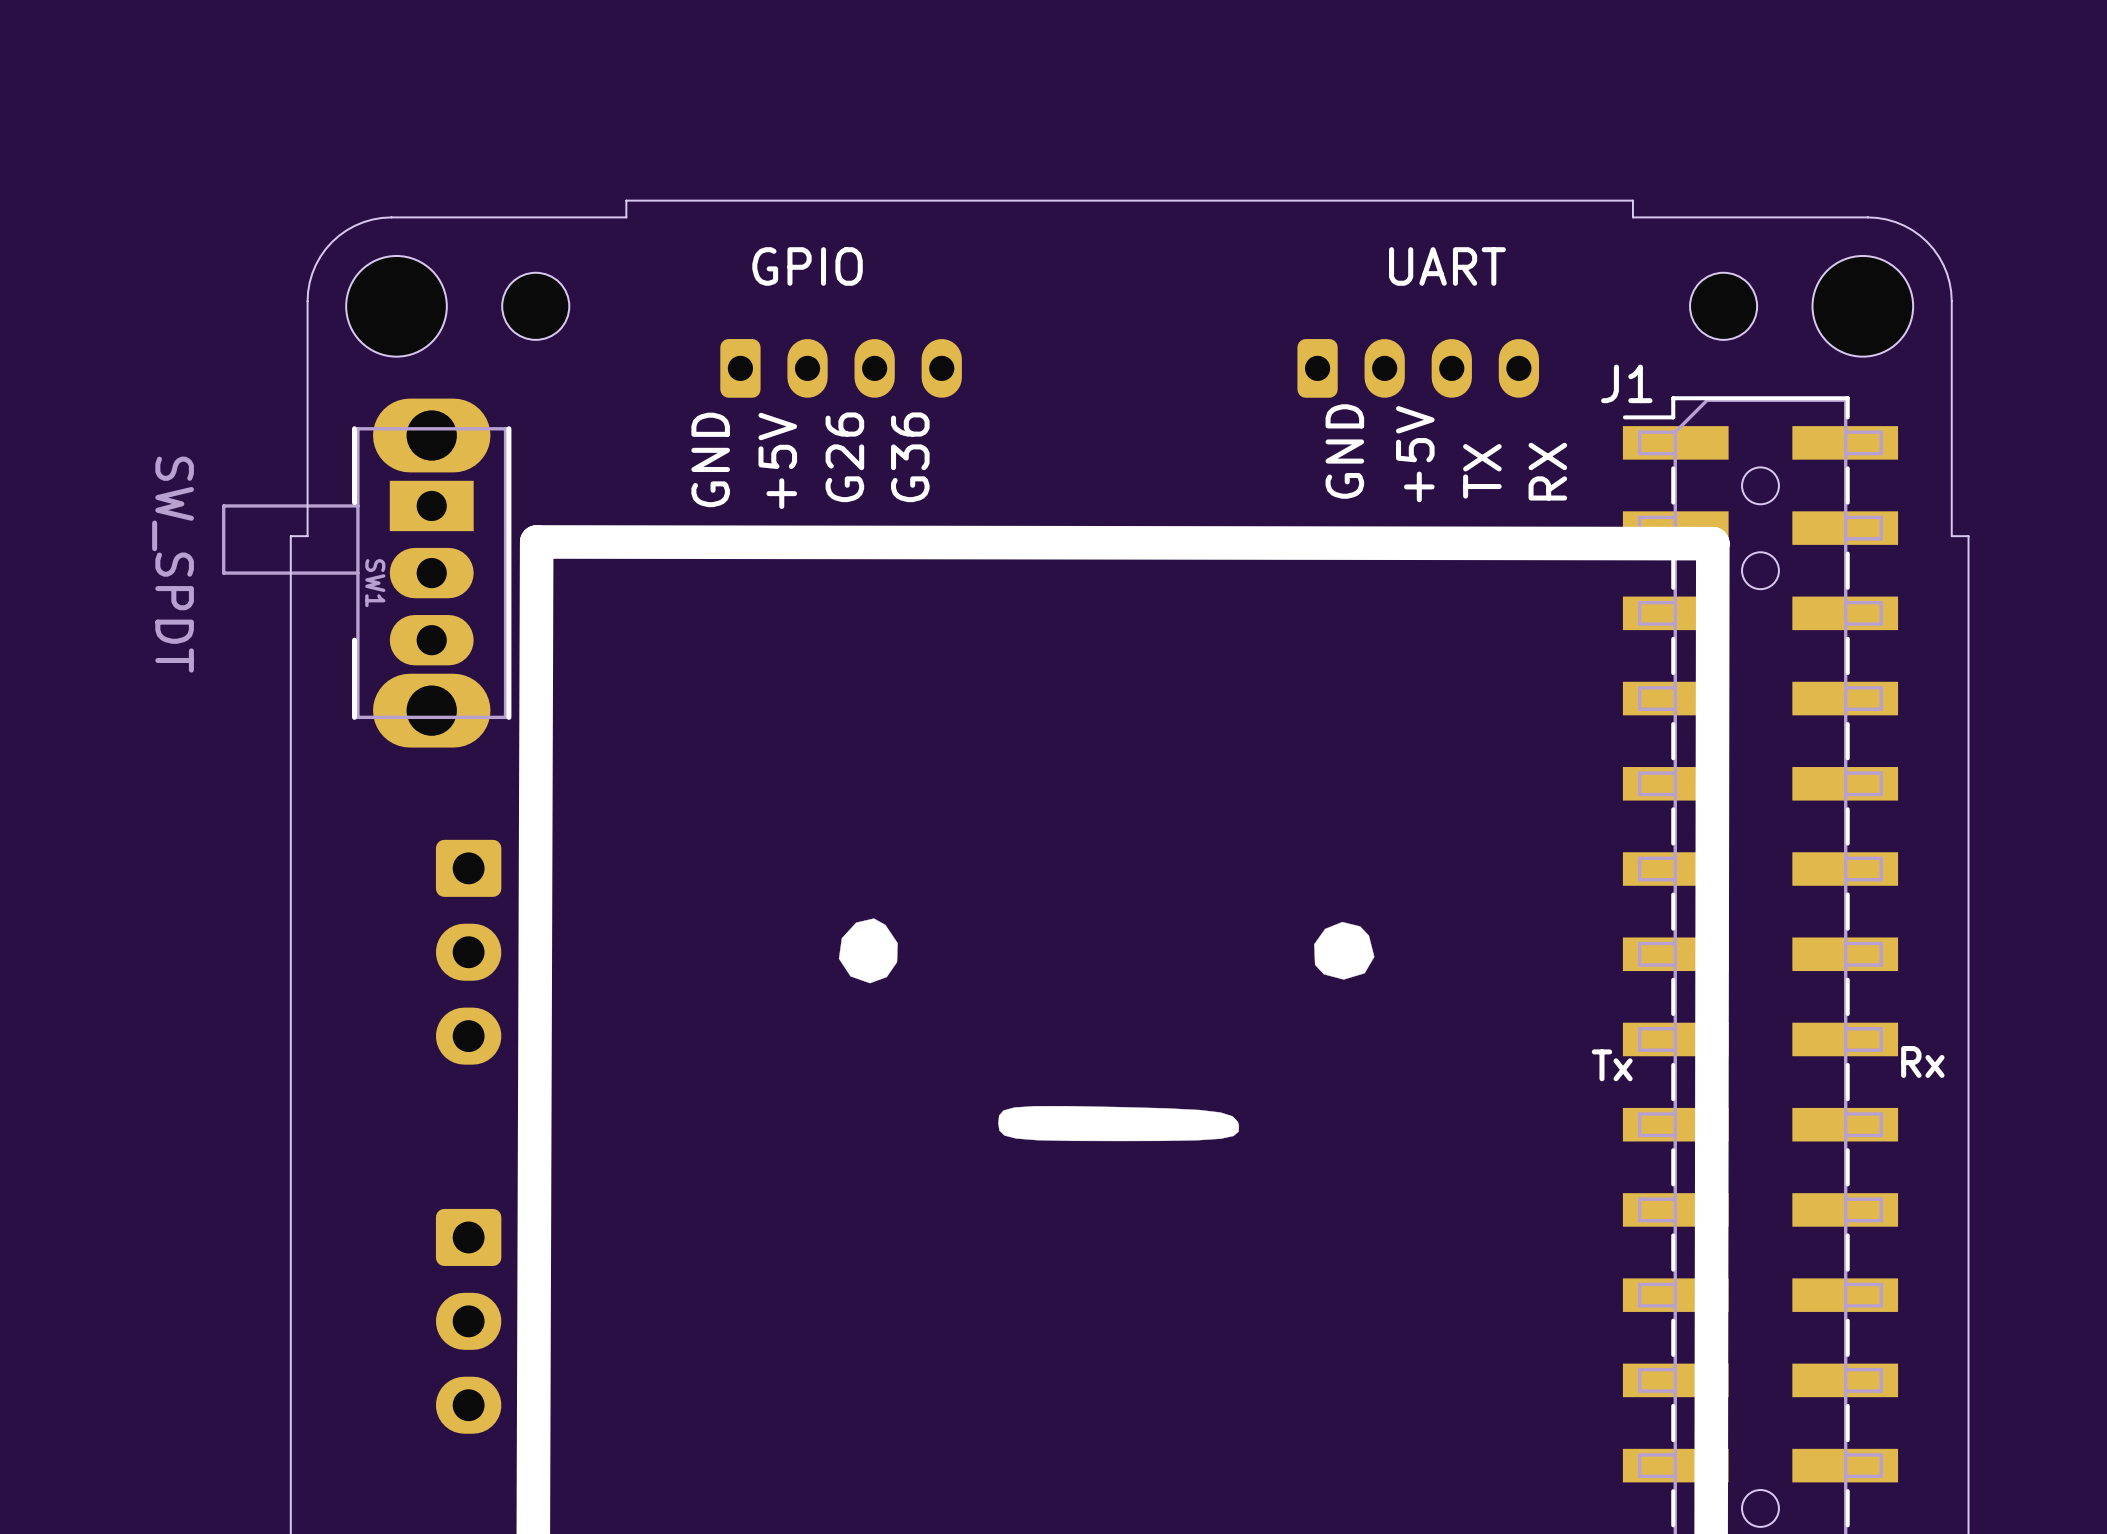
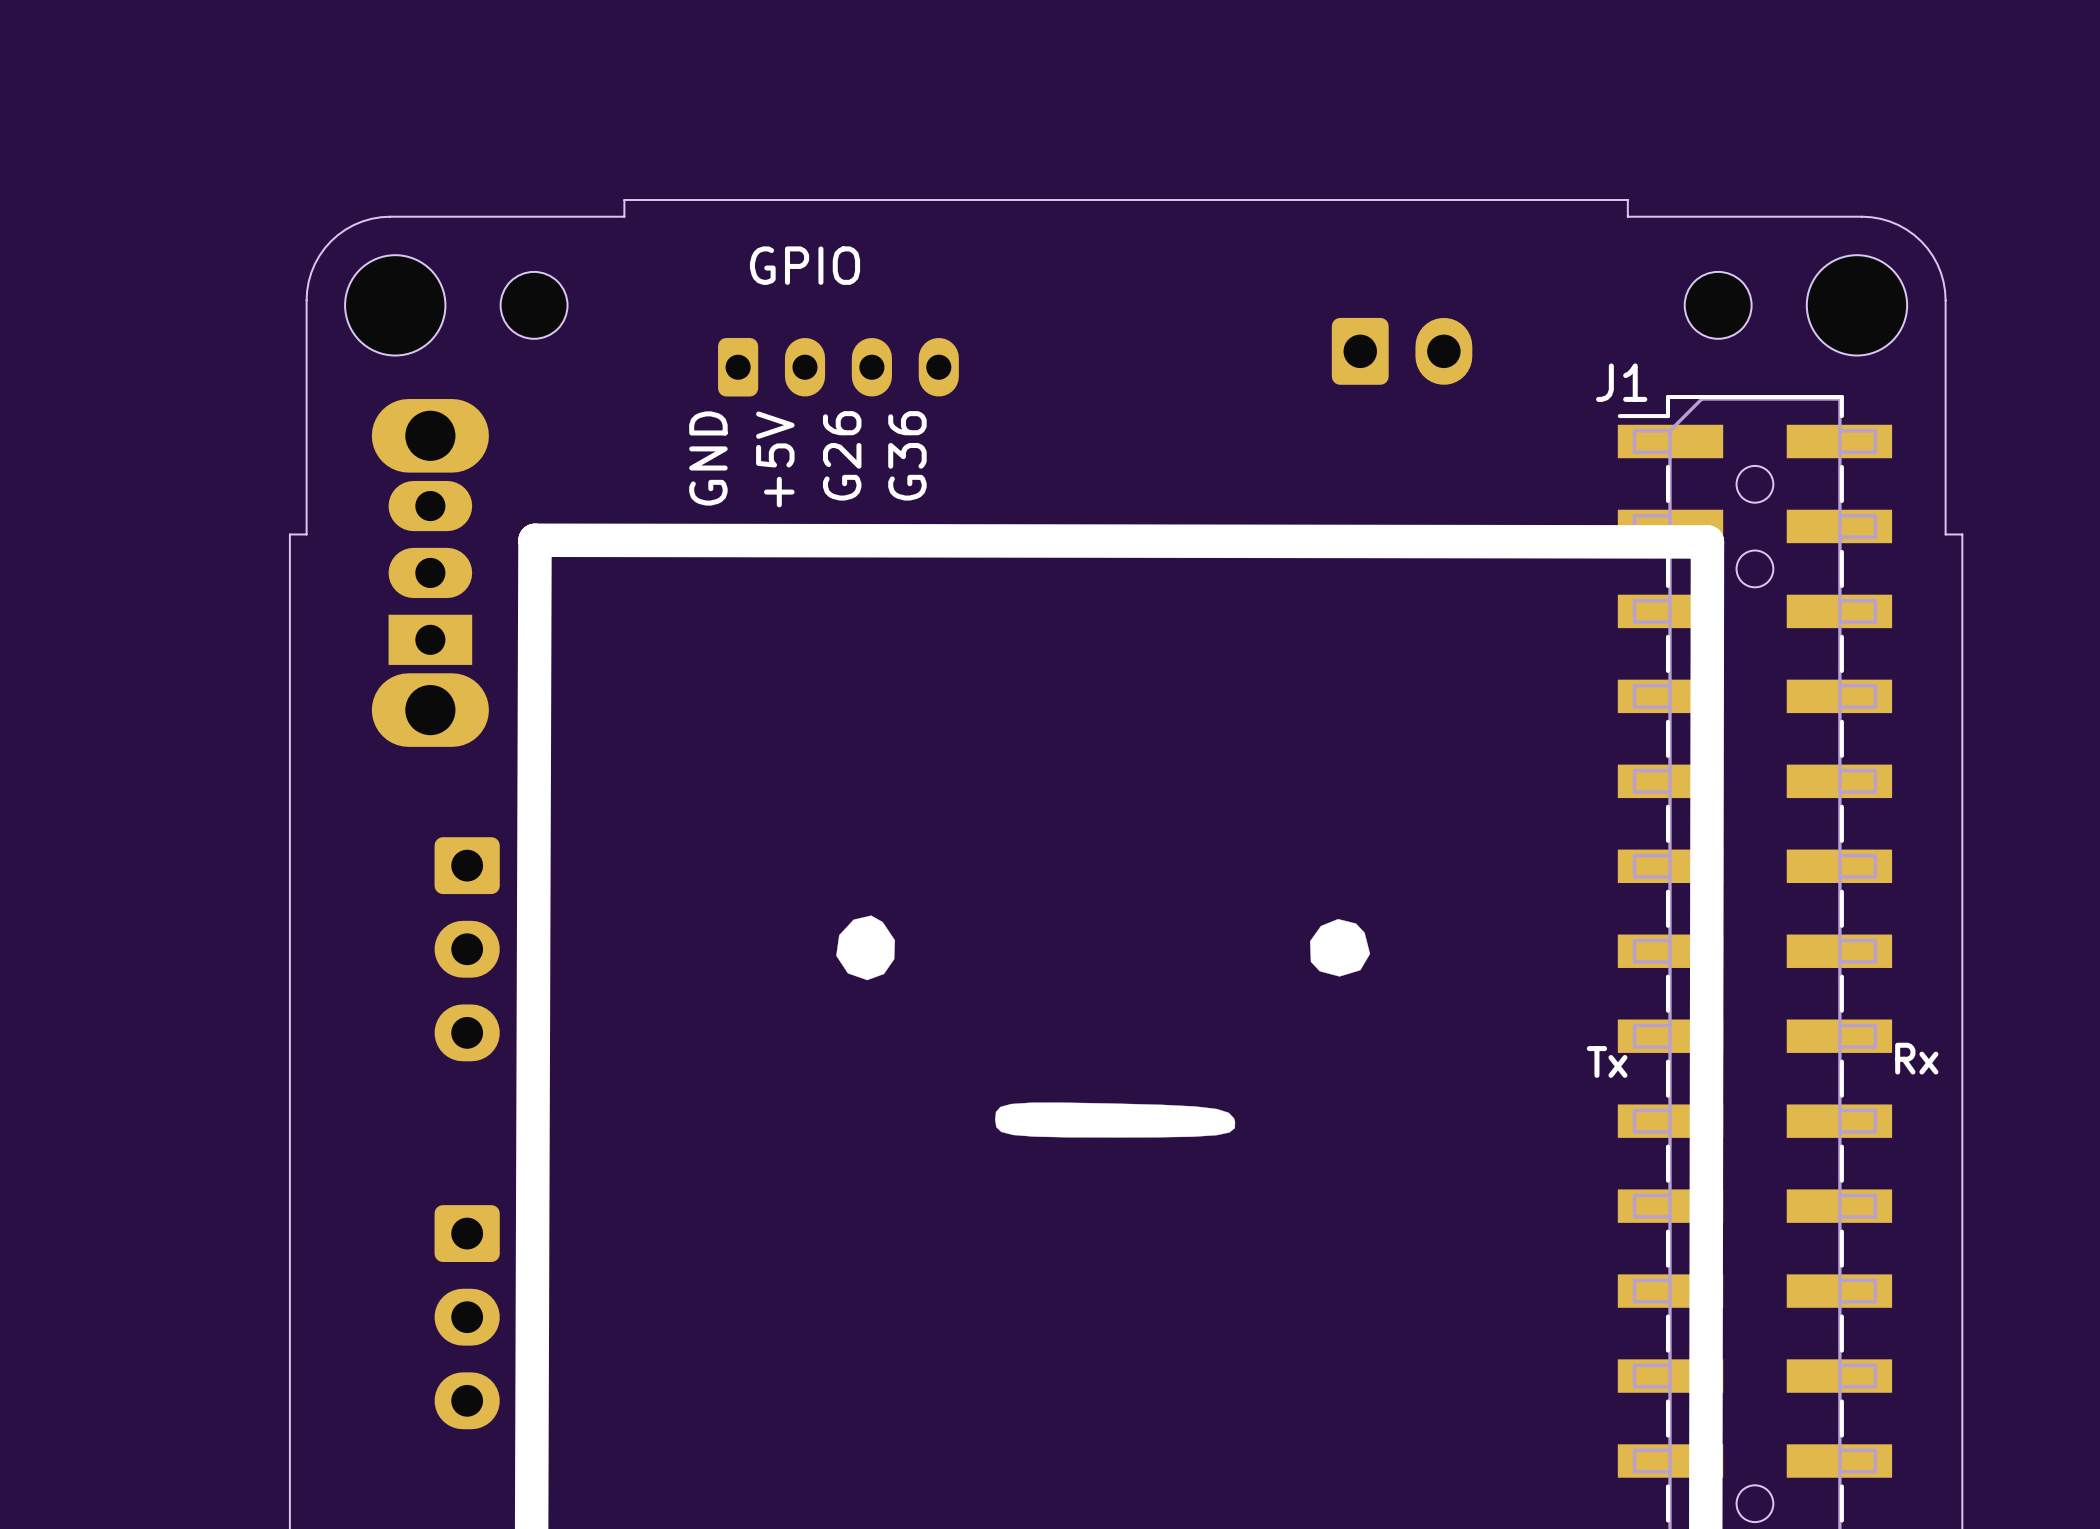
text: UART (1447, 266) -> none
part footprint: [1297, 339, 1540, 398] -> [1331, 317, 1473, 385]
text: GND (1344, 451) -> none
text: +5V (1415, 454) -> none
text: TX (1482, 471) -> none
text: RX (1547, 471) -> none
SW1 side: bottom (366, 573) -> top (430, 572)

